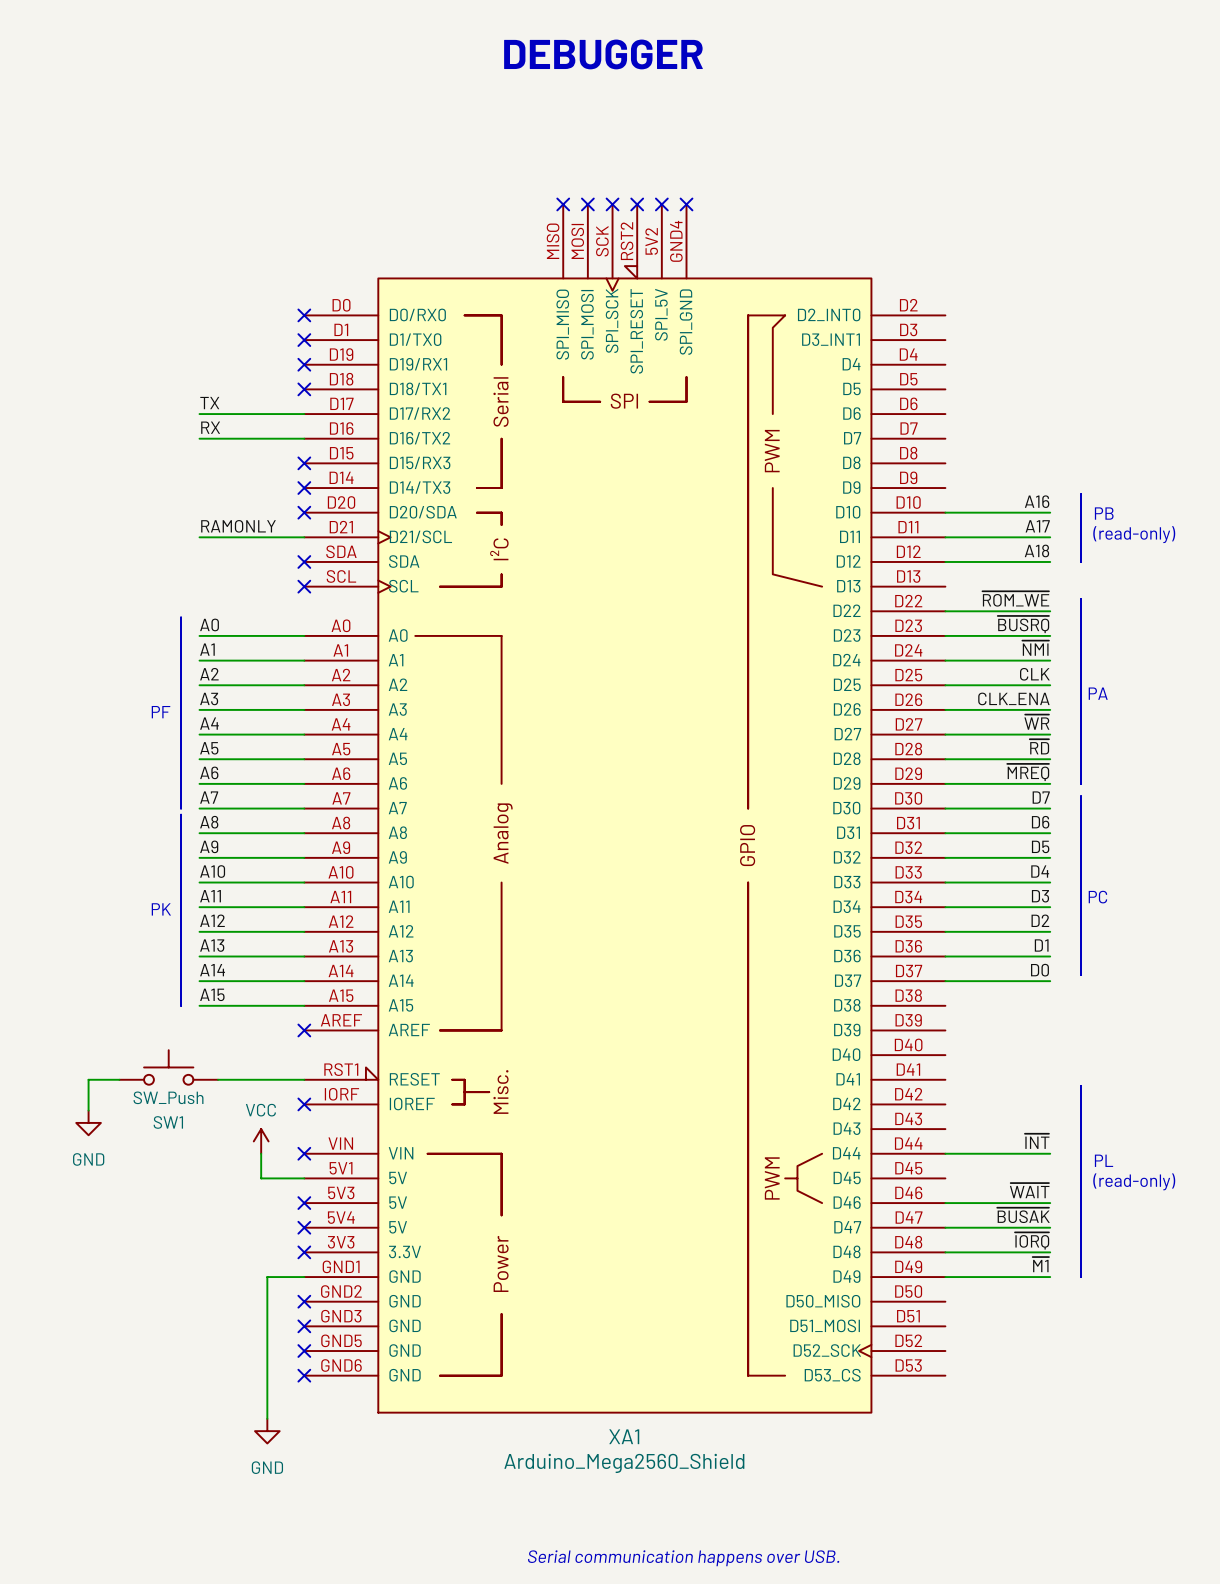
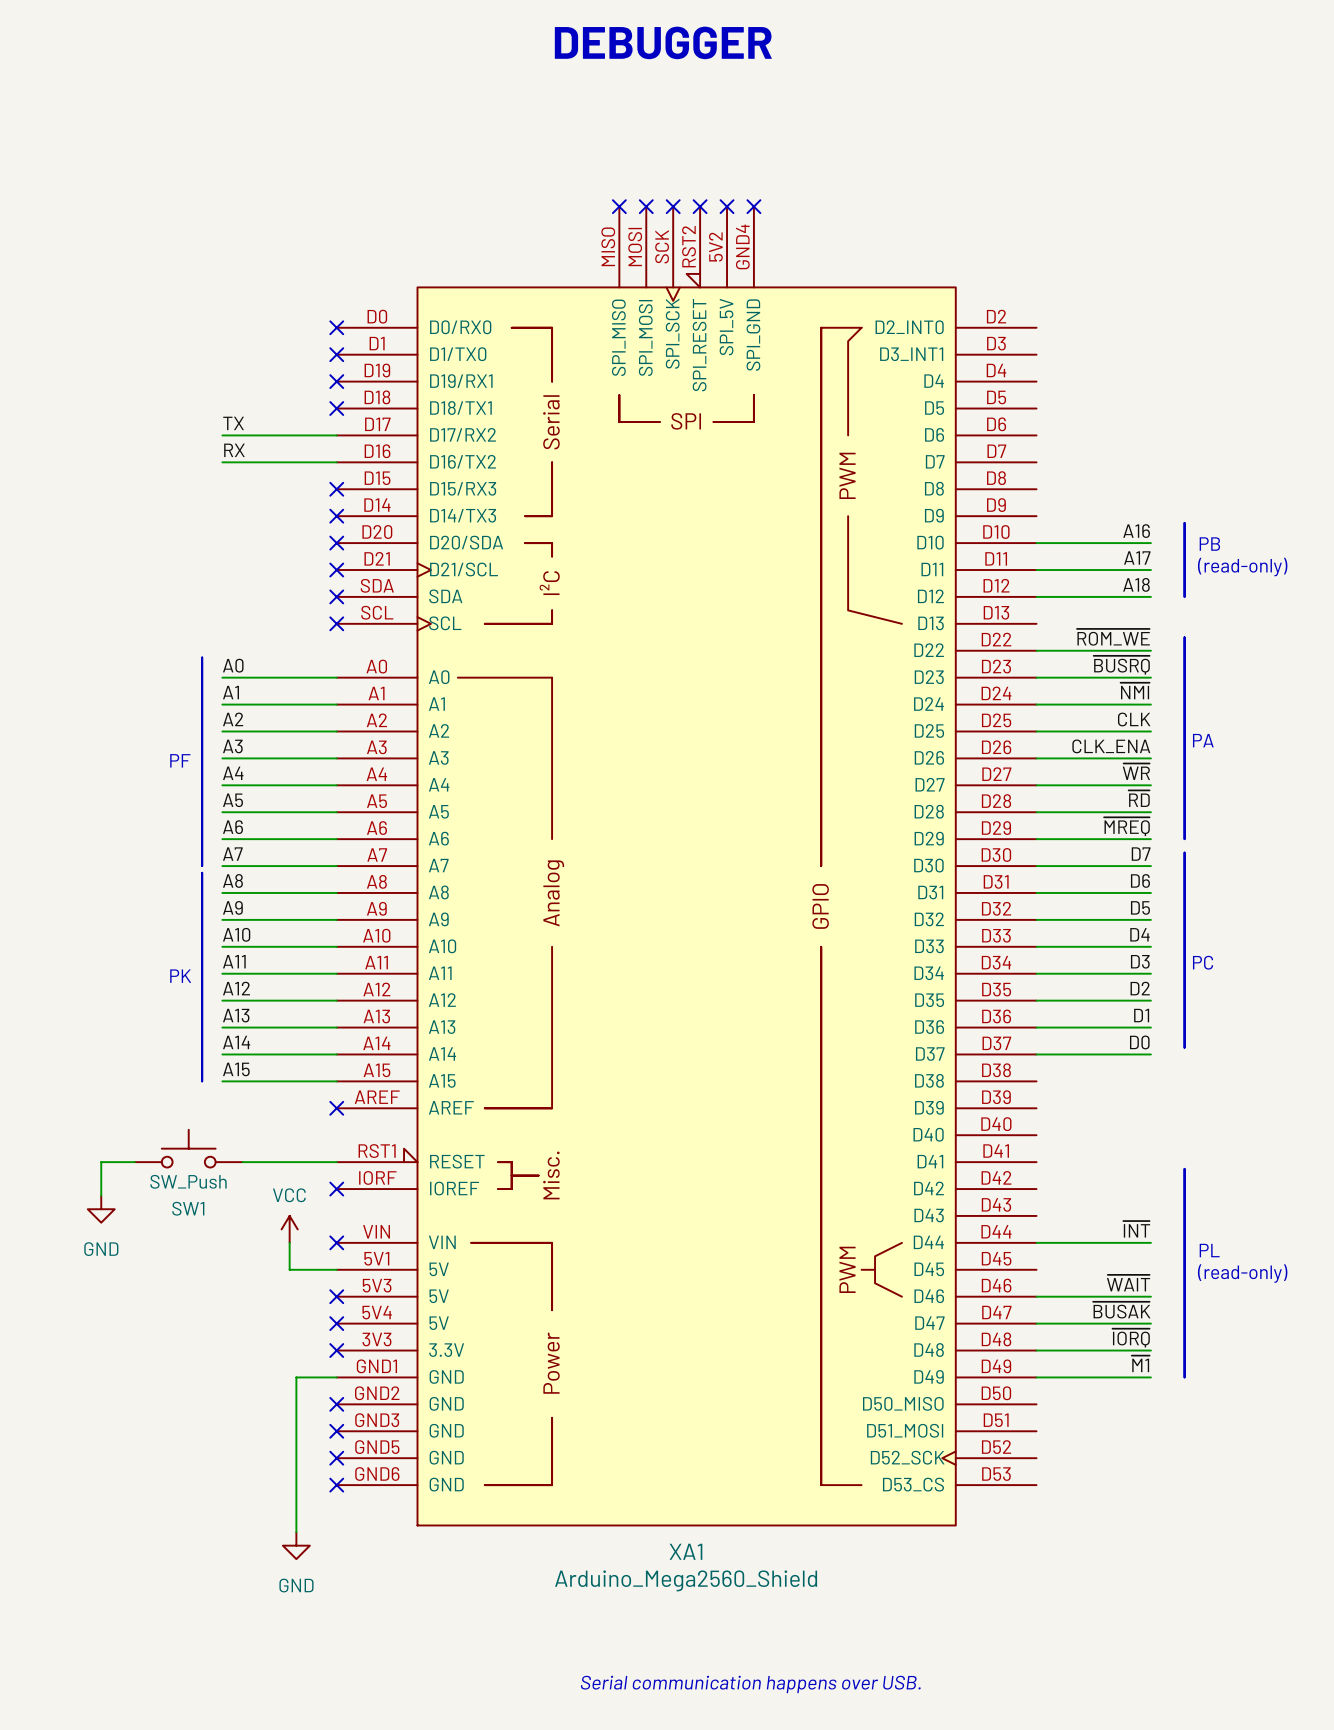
label: RAMONLY (238, 526) -> none
wire: (199, 537) (304, 537) -> none
no-connect mark: none -> (336, 570)

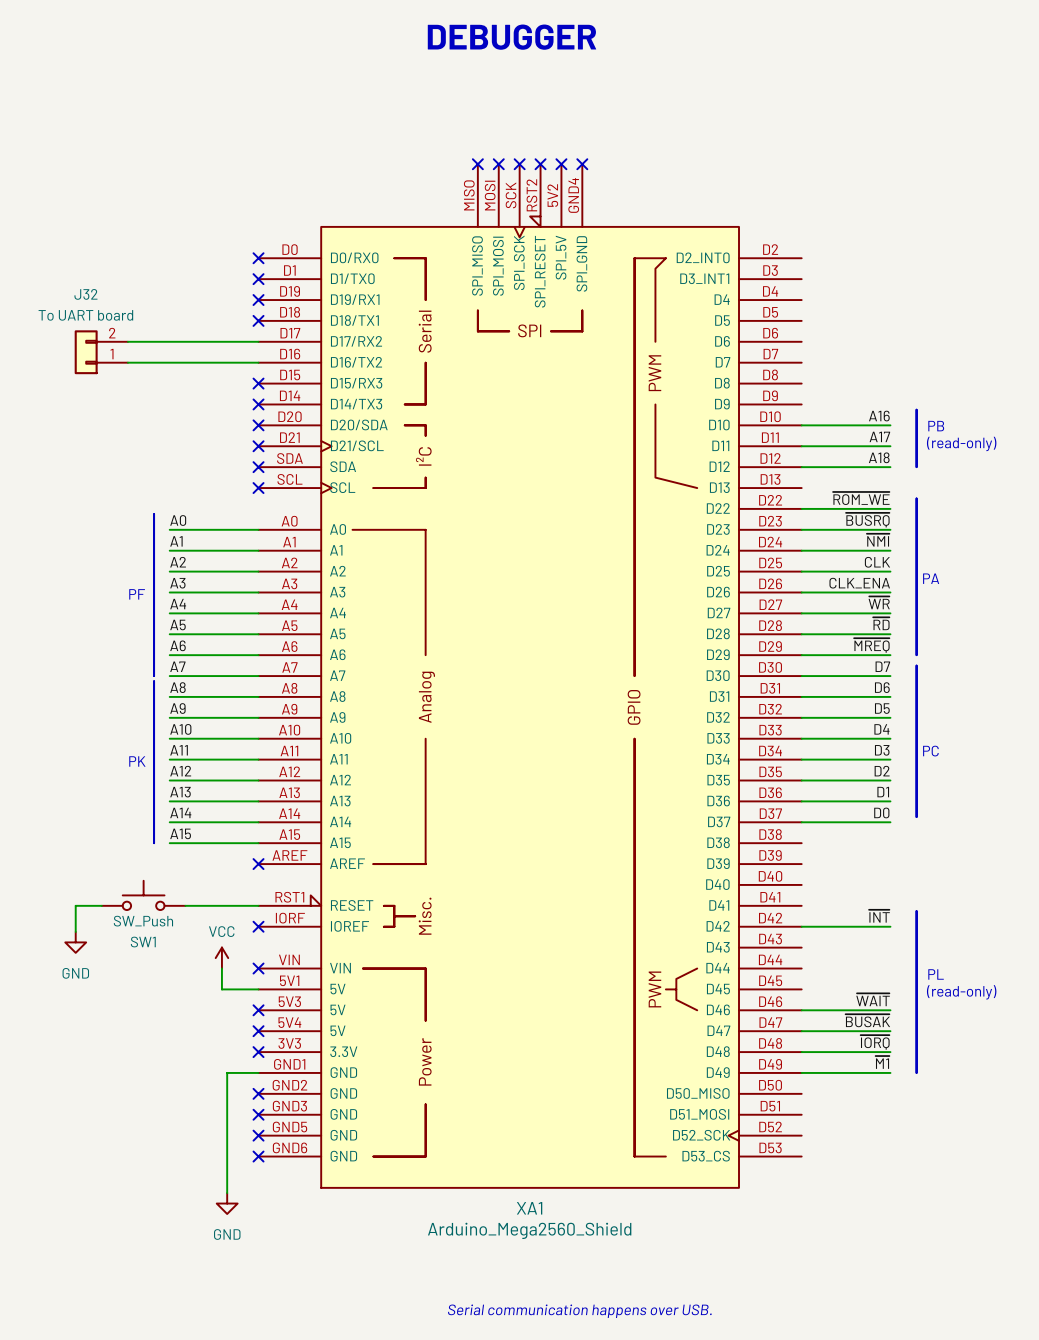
label: TX (233, 423) -> none
wire: none -> (127, 341) (169, 341)
J32: none -> To UART board (101, 352)
label: RX (234, 450) -> none
wire: none -> (127, 362) (169, 362)
label position: ~{INT} (1136, 1229) -> ~{INT} (879, 916)
wire: (1036, 1242) (1150, 1242) -> (801, 926) (890, 926)

